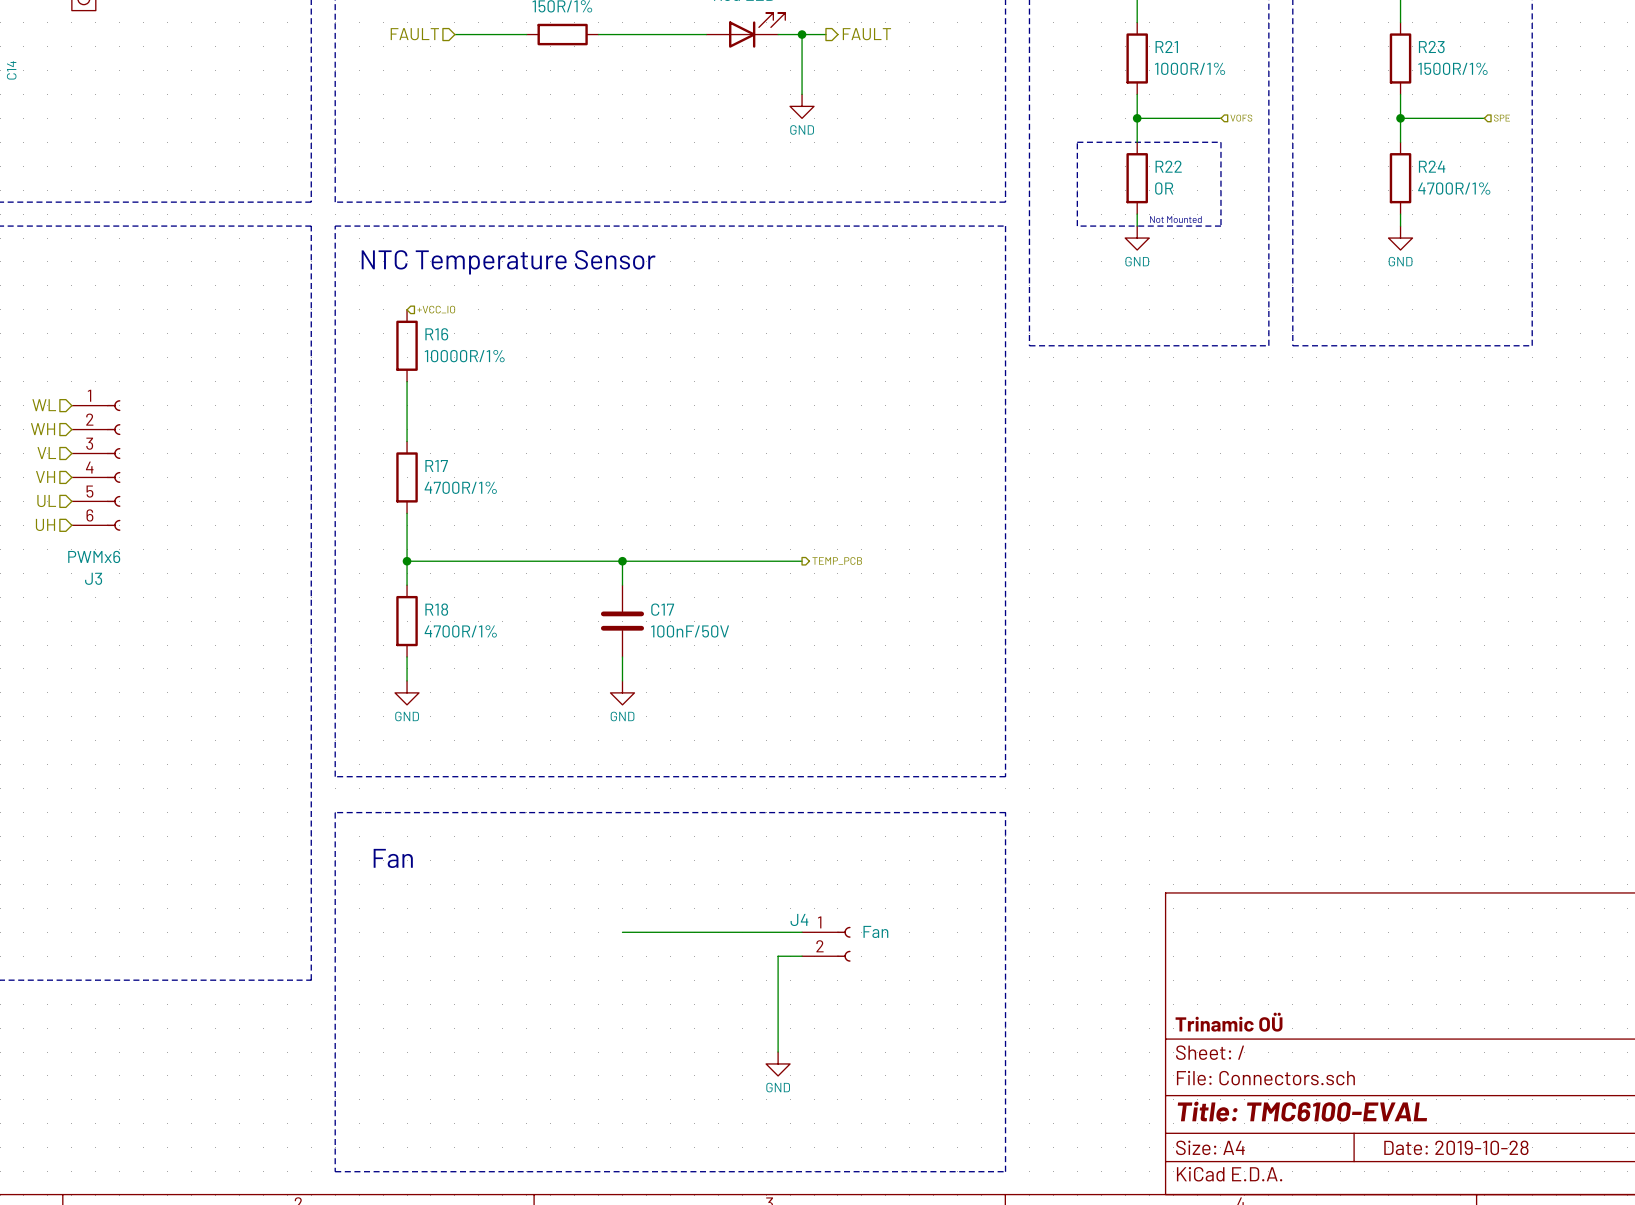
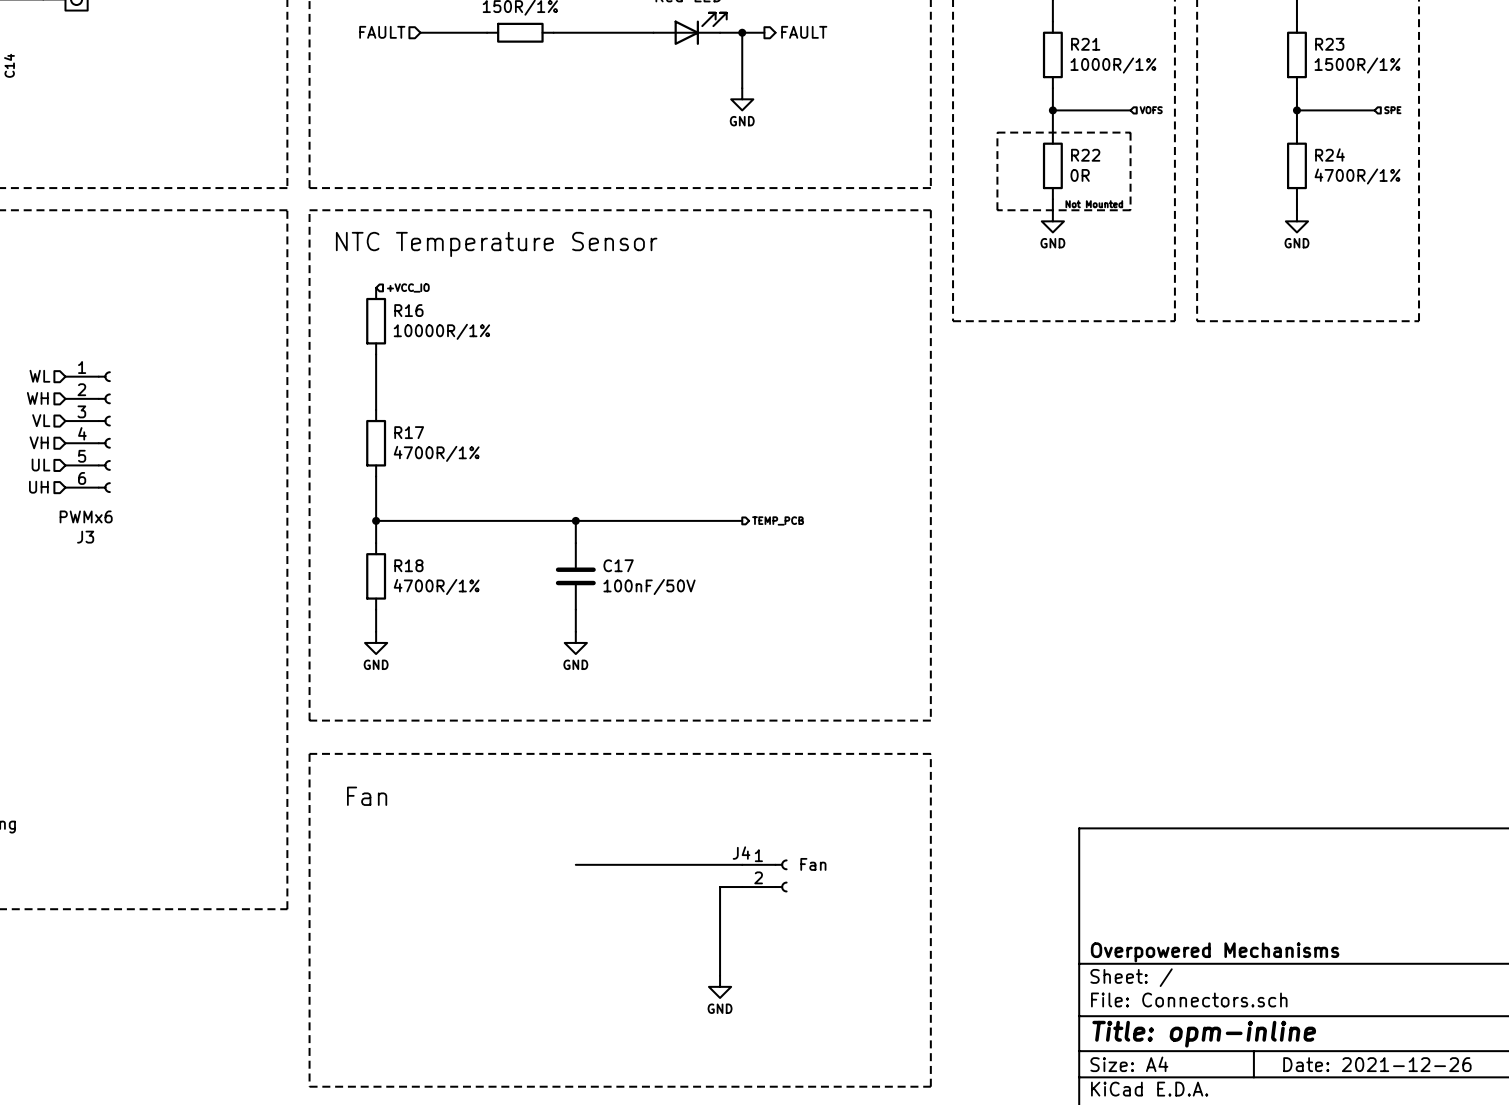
title block: Trinamic OÜ (1229, 1022) -> Overpowered Mechanisms (1215, 952)
title block: Title: TMC6100-EVAL (1302, 1111) -> Title: opm-inline (1204, 1034)
title block: Date: 2019-10-28 (1456, 1147) -> Date: 2021-12-26 (1377, 1064)

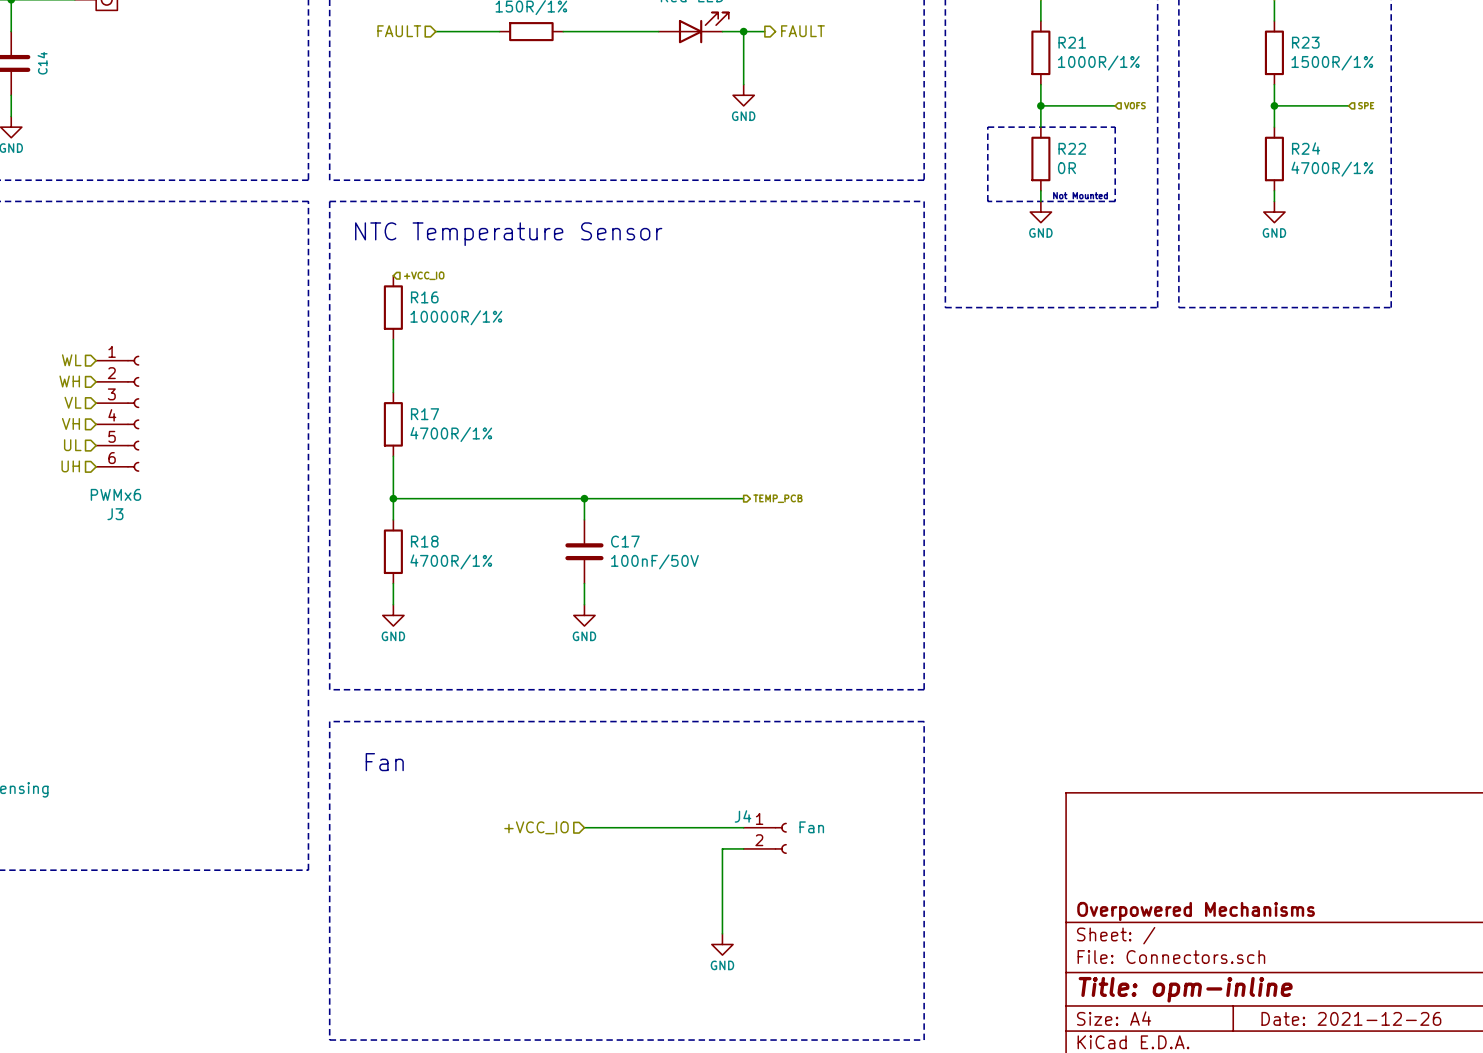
hierarchical label: none -> +VCC_IO (536, 827)

